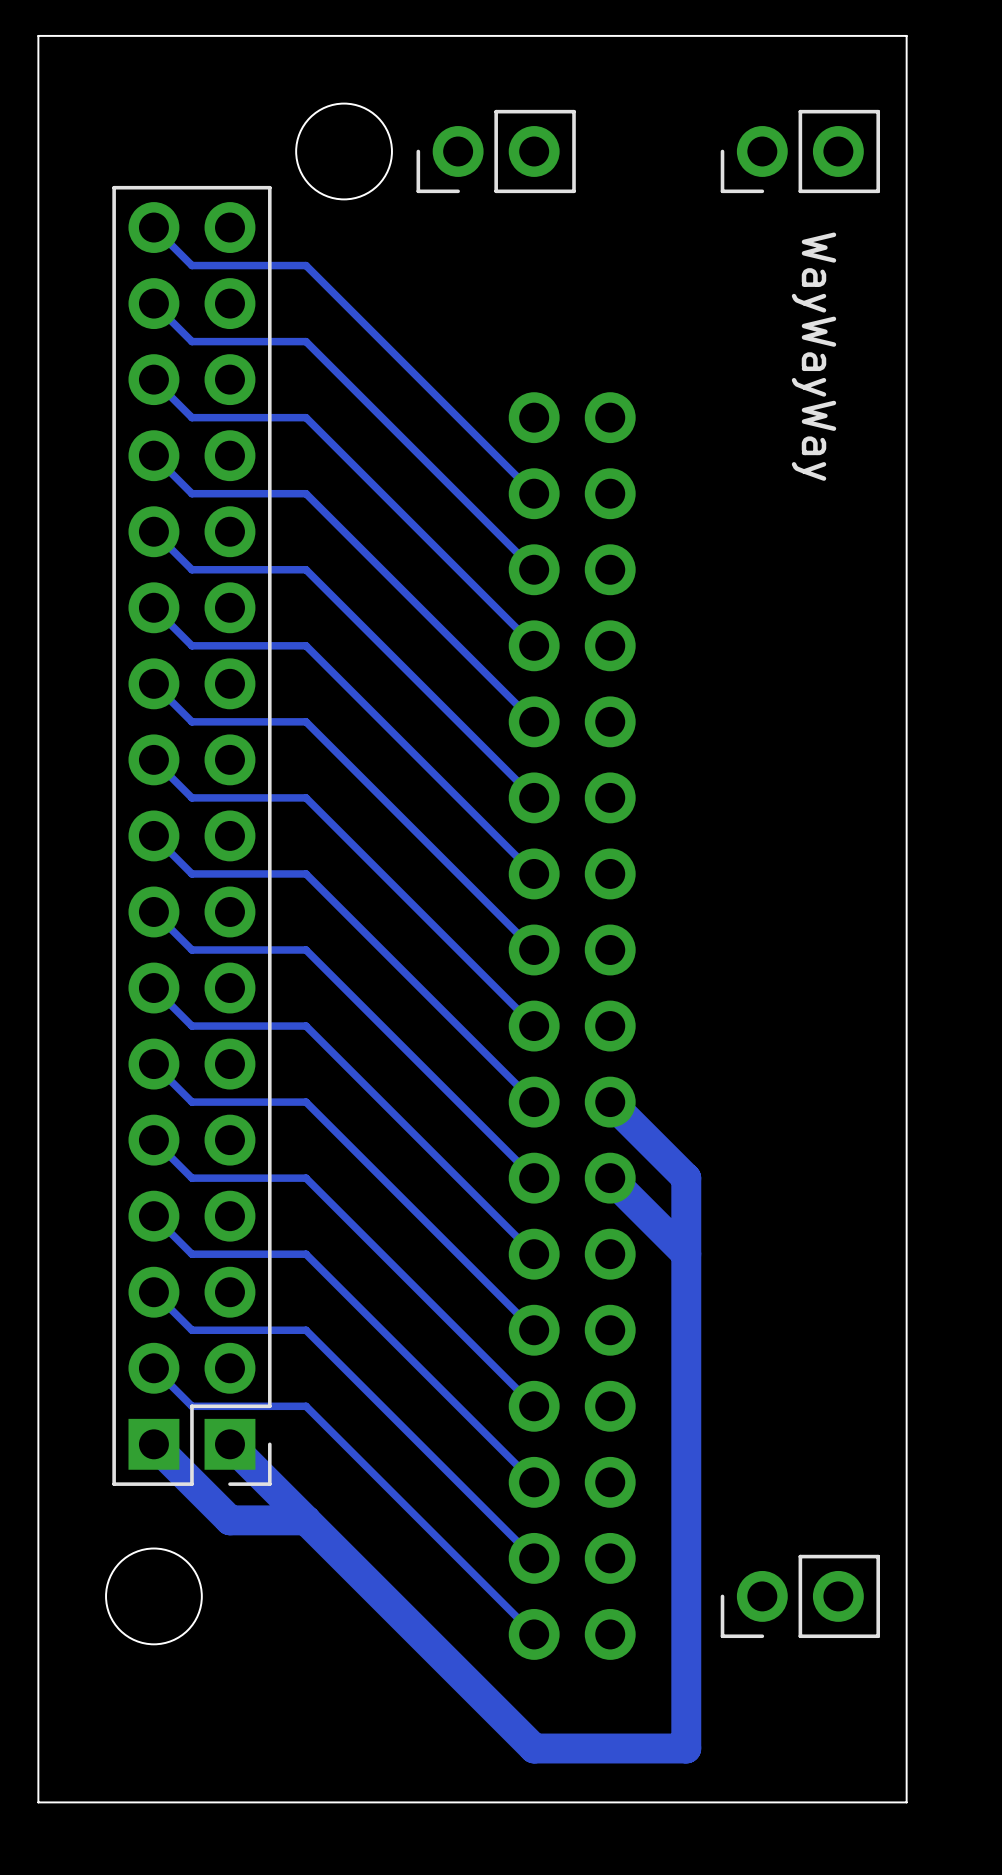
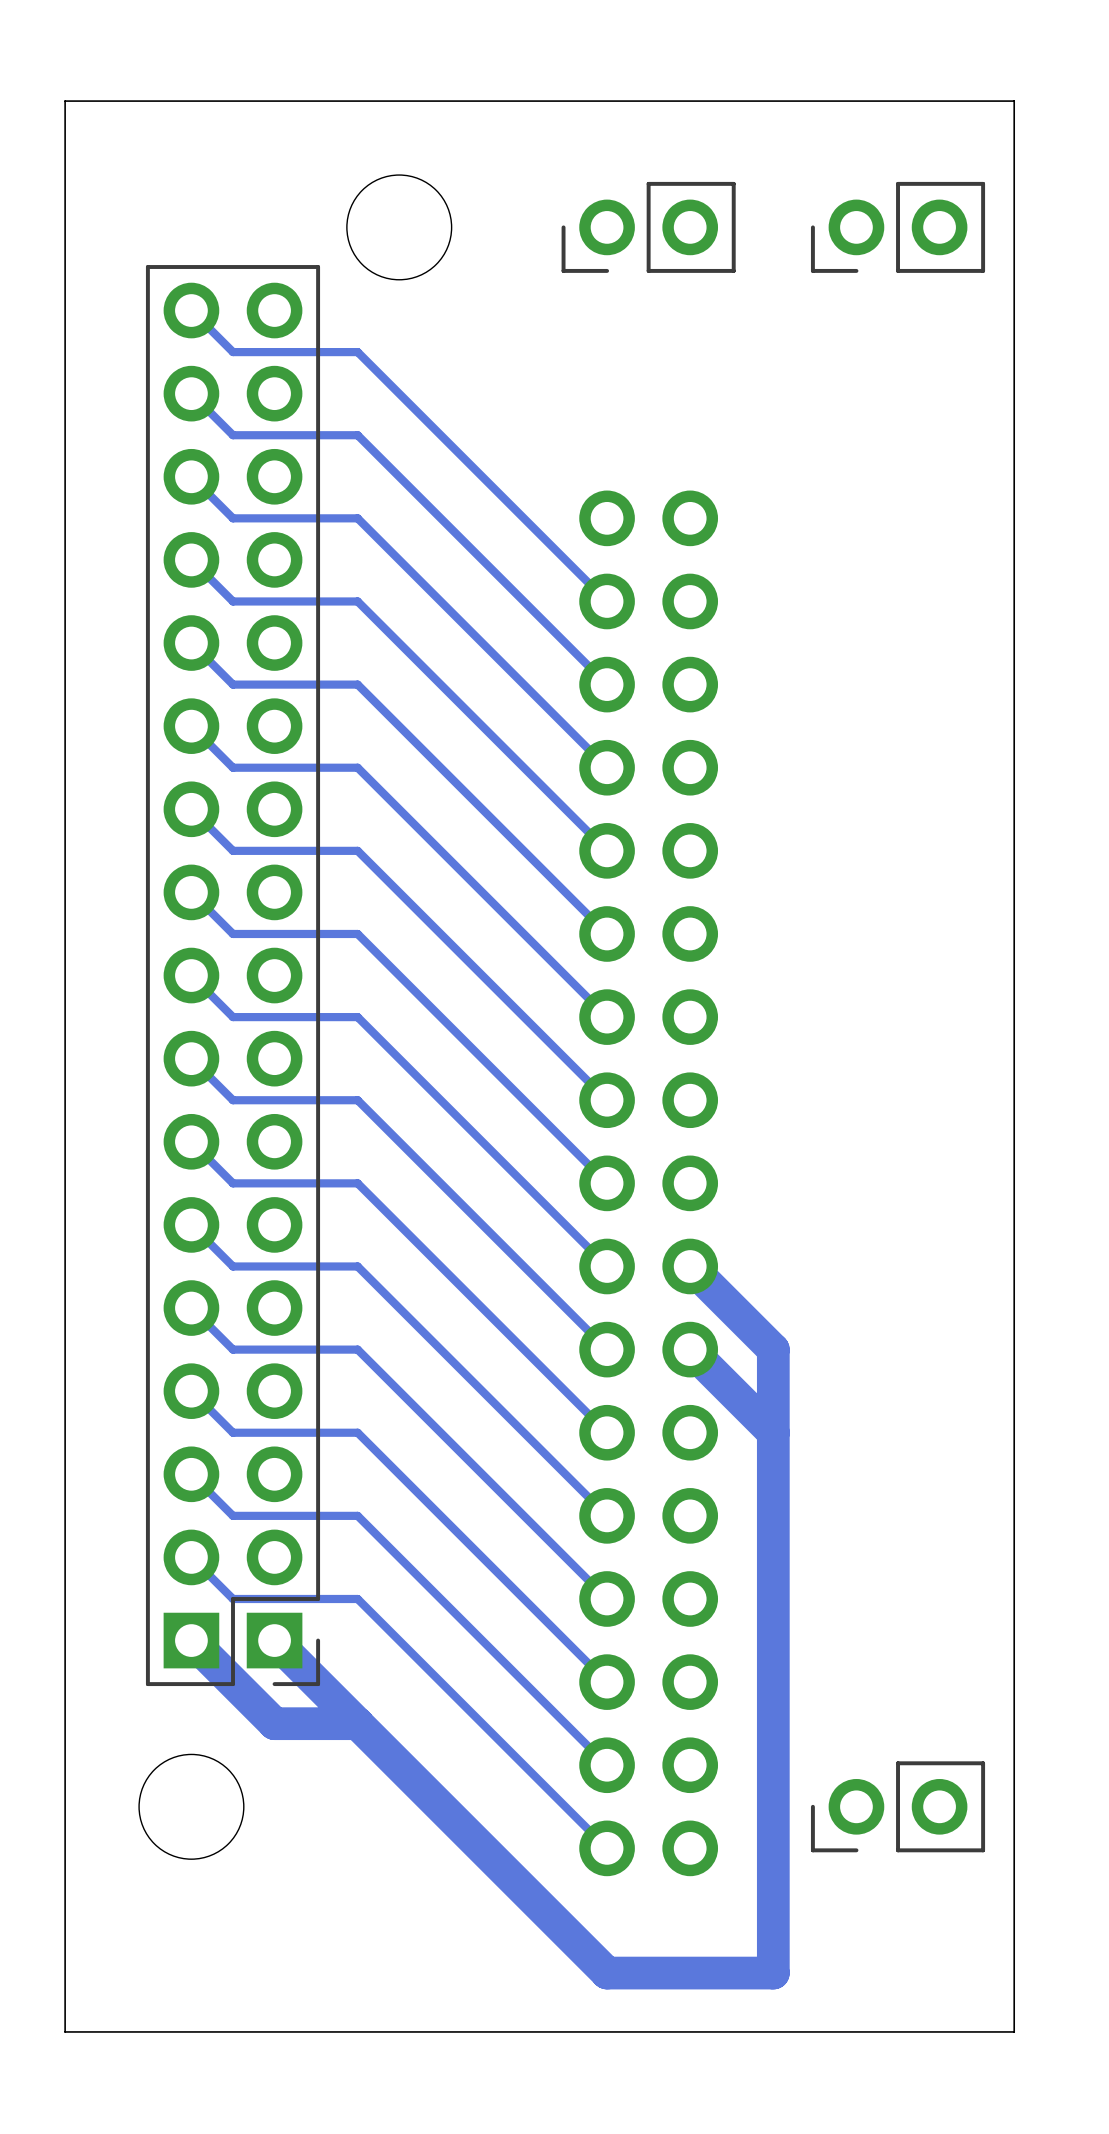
part position: (496, 151) -> (648, 227)
text: WayWayWay (814, 356) -> none

